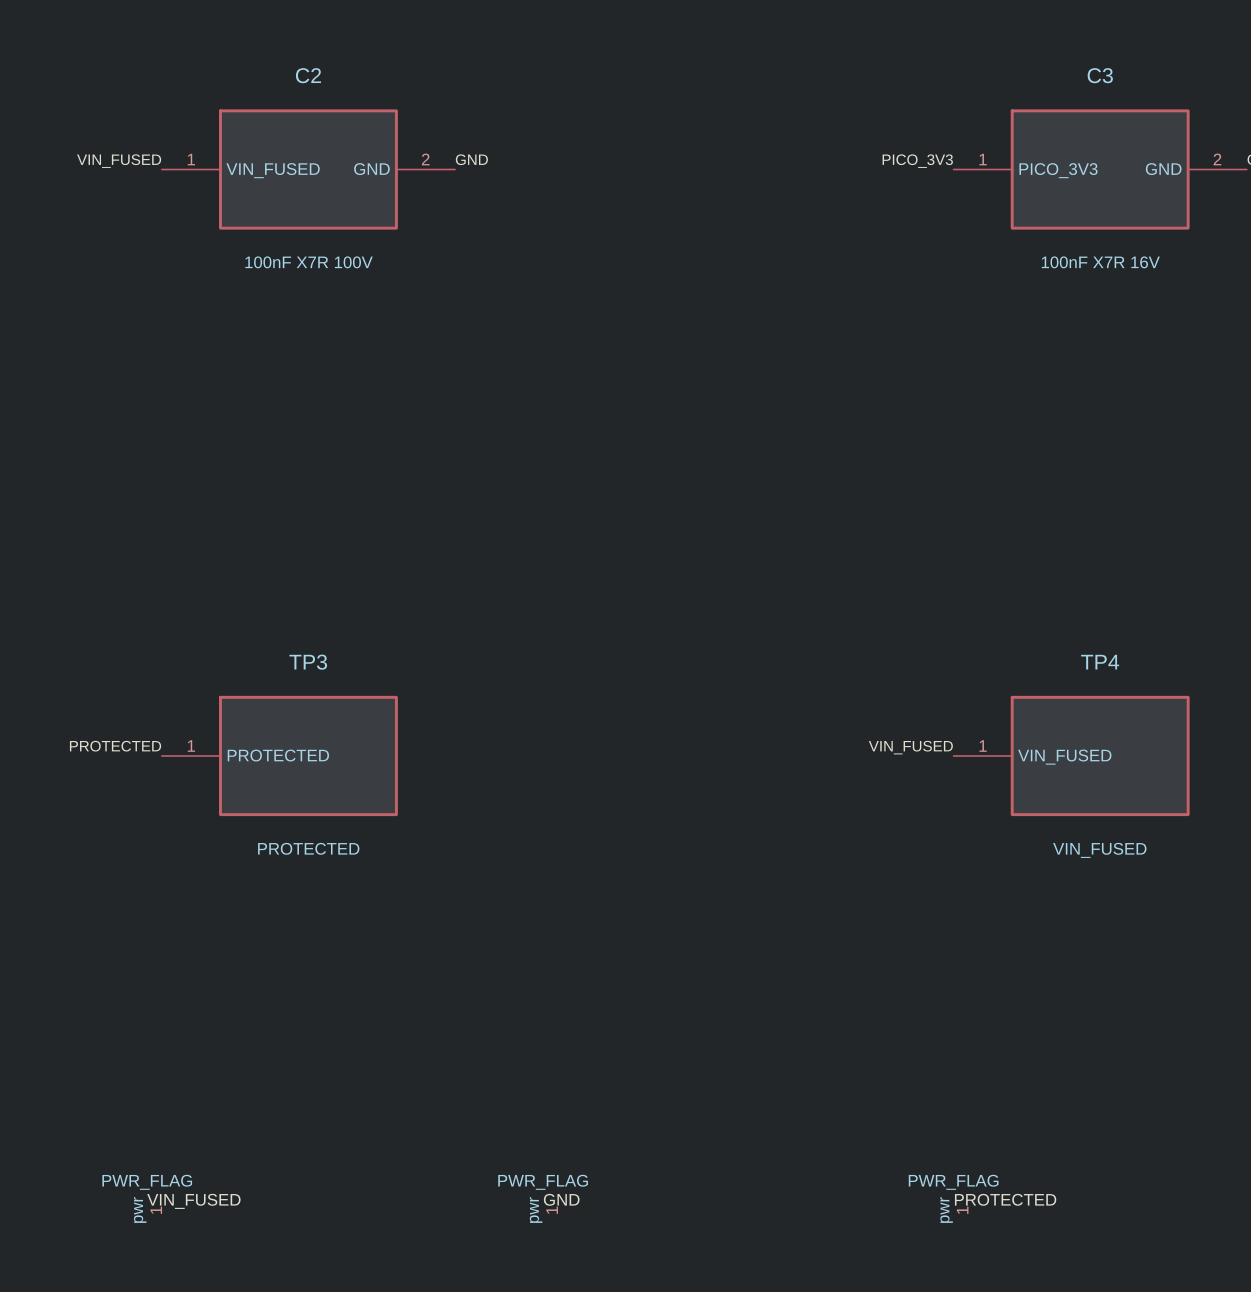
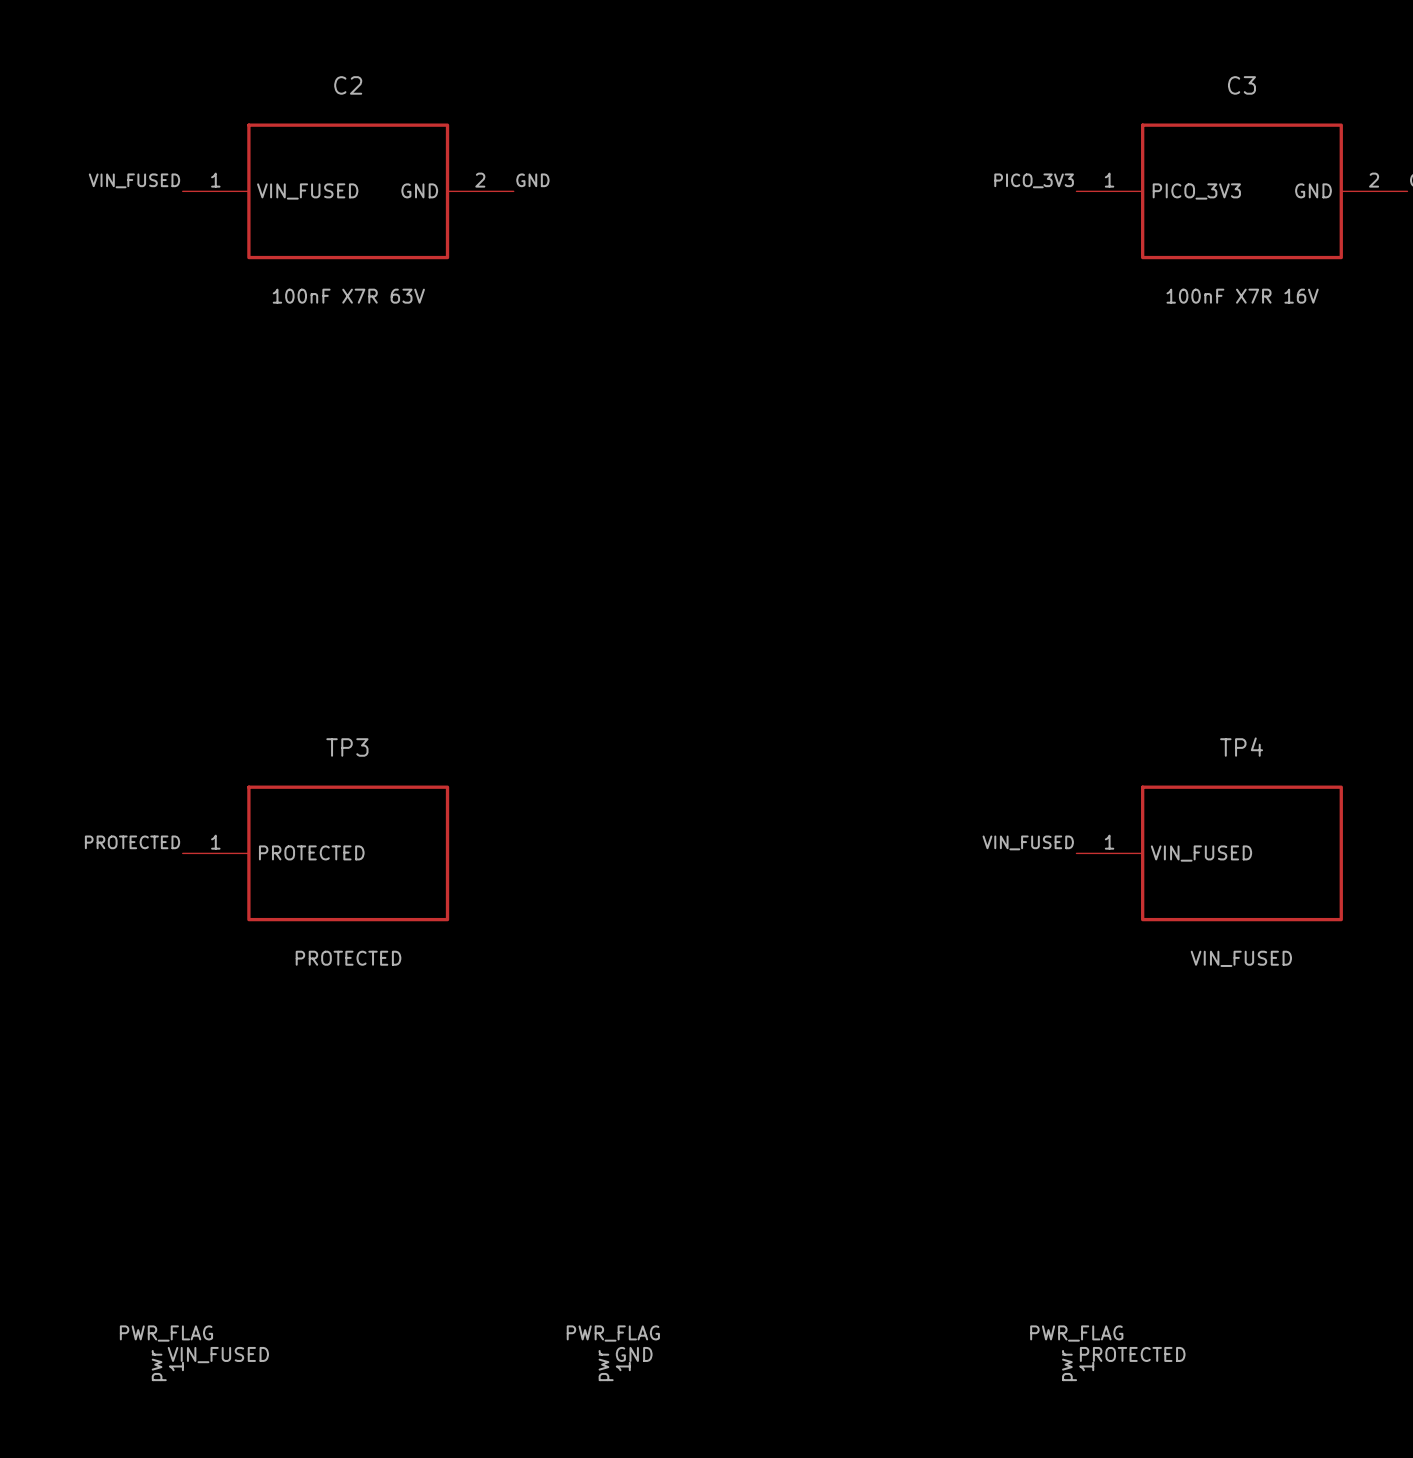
C2 value: 100nF X7R 100V (309, 262) -> 100nF X7R 63V (348, 296)

